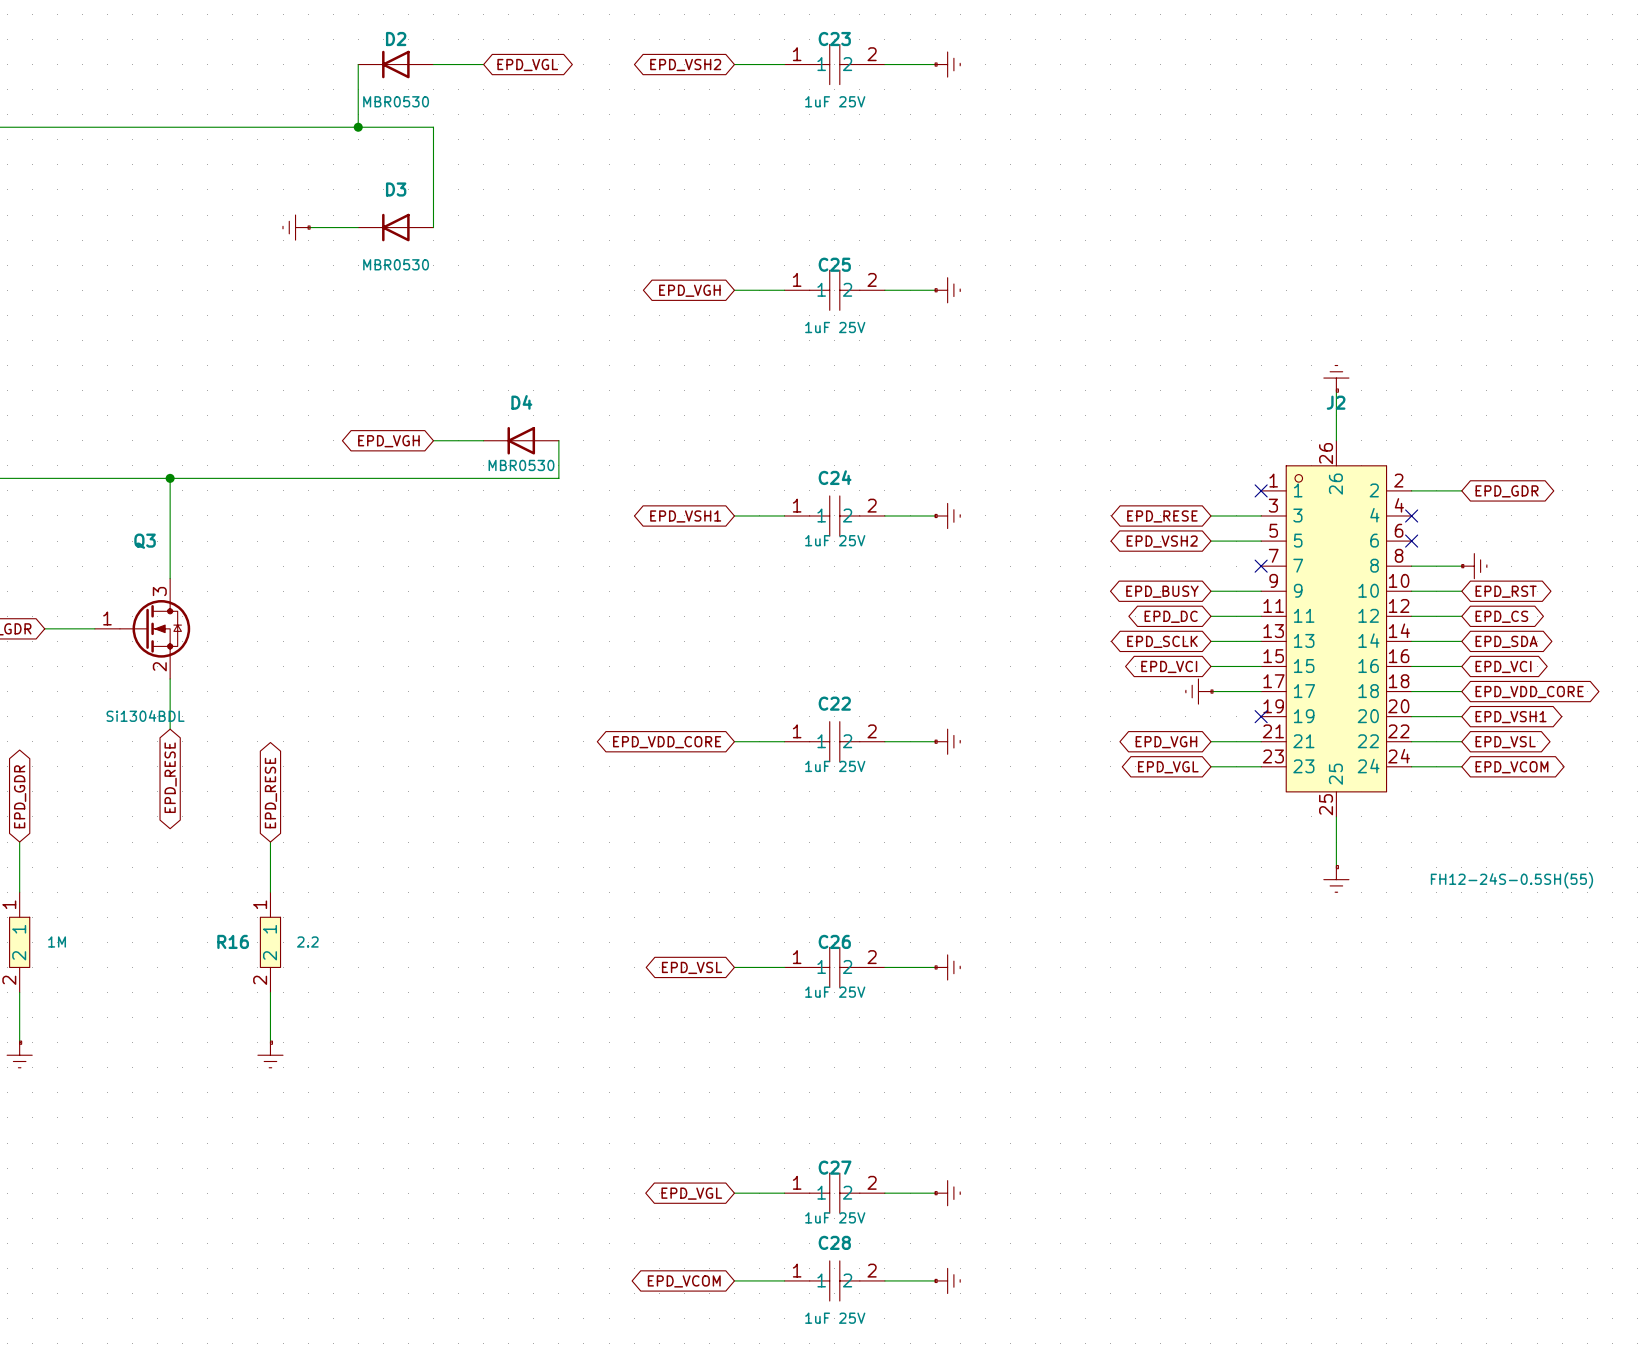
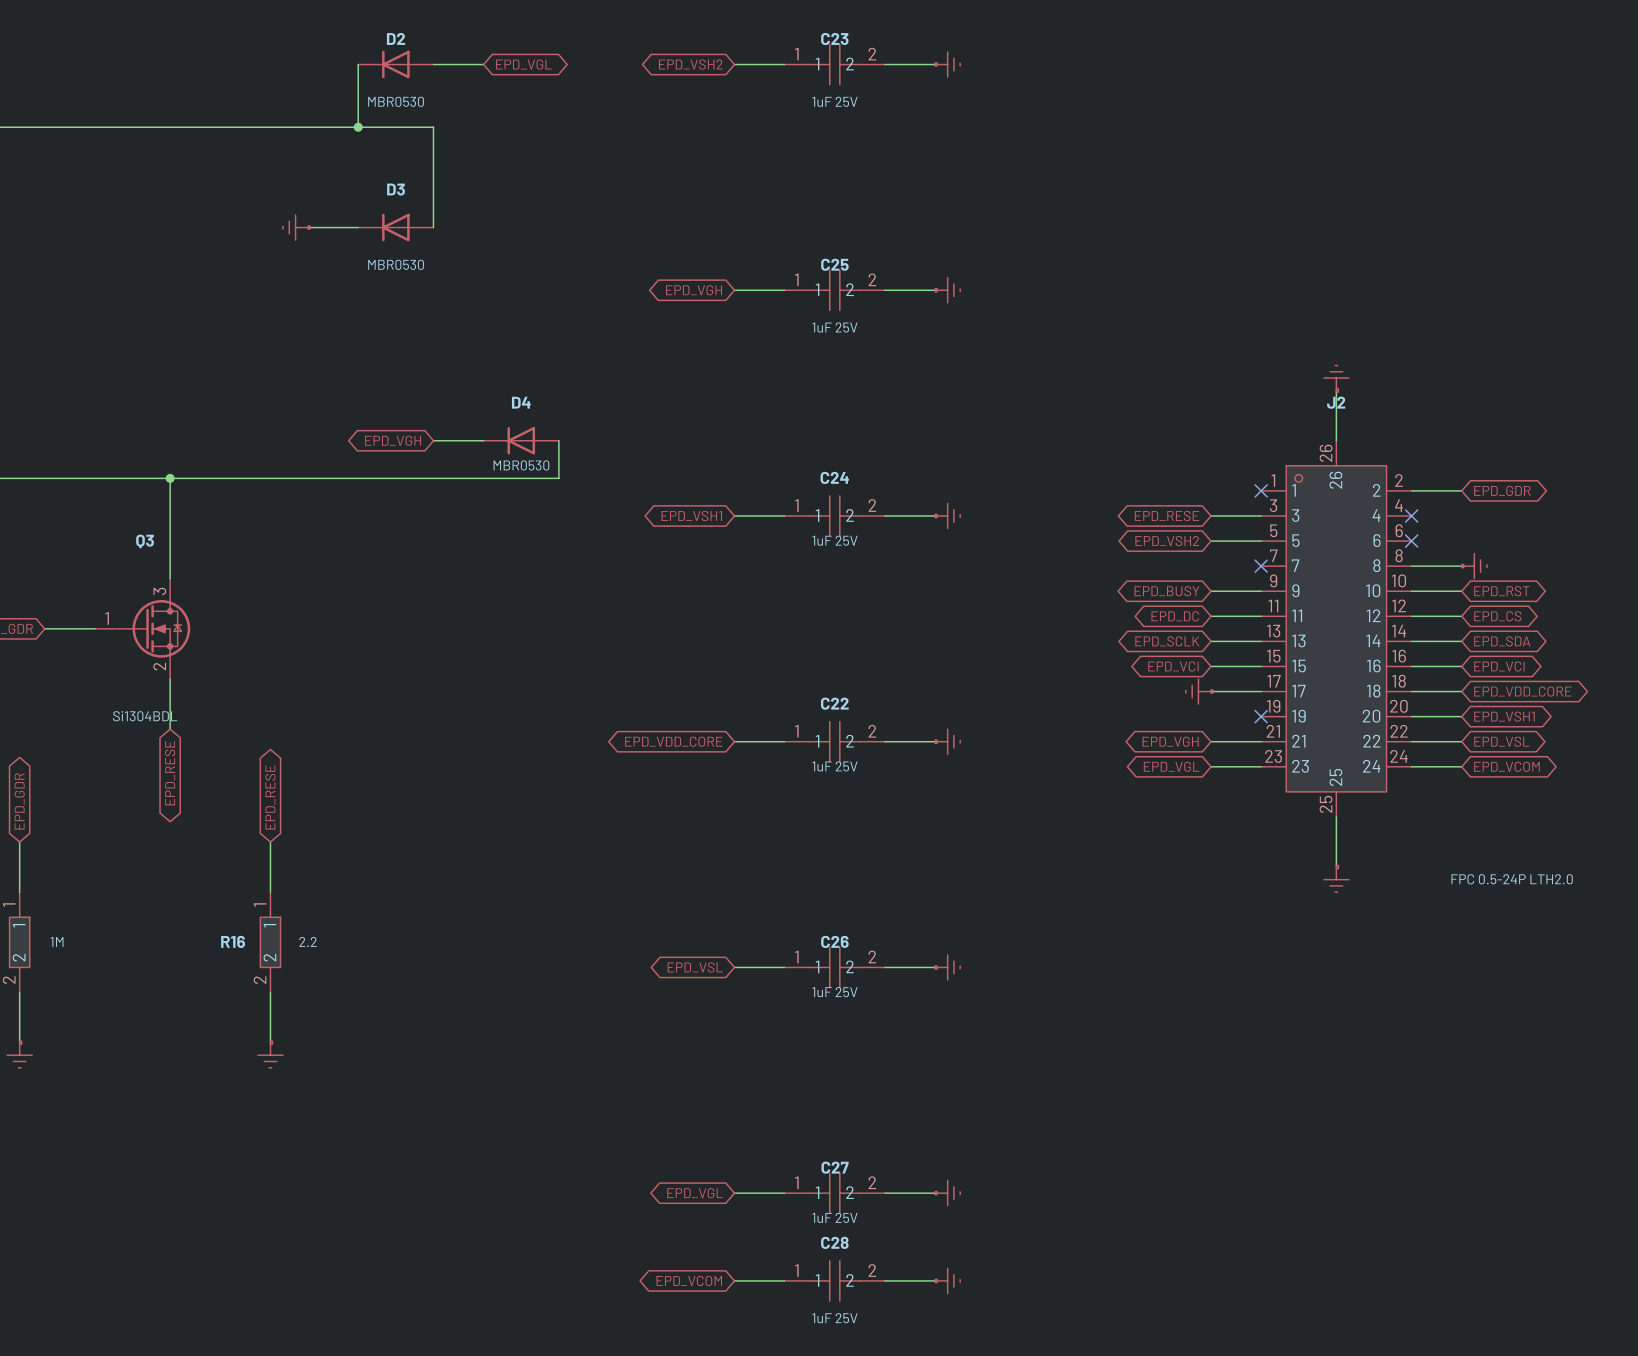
J2 value: FH12-24S-0.5SH(55) (1511, 880) -> FPC 0.5-24P LTH2.0 (1512, 879)

